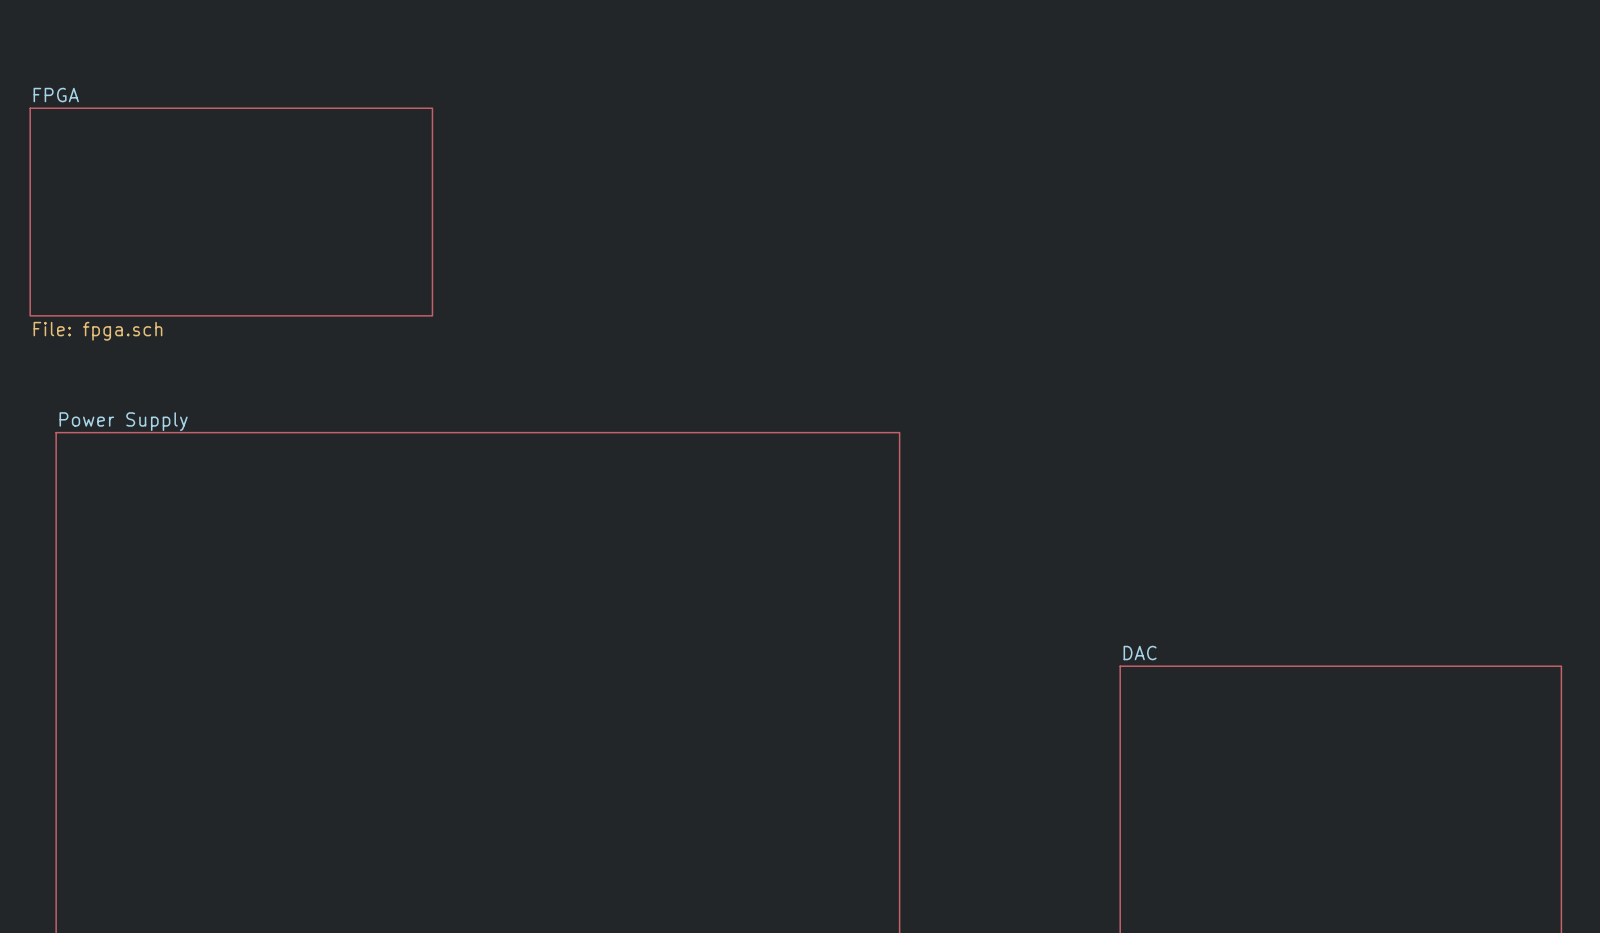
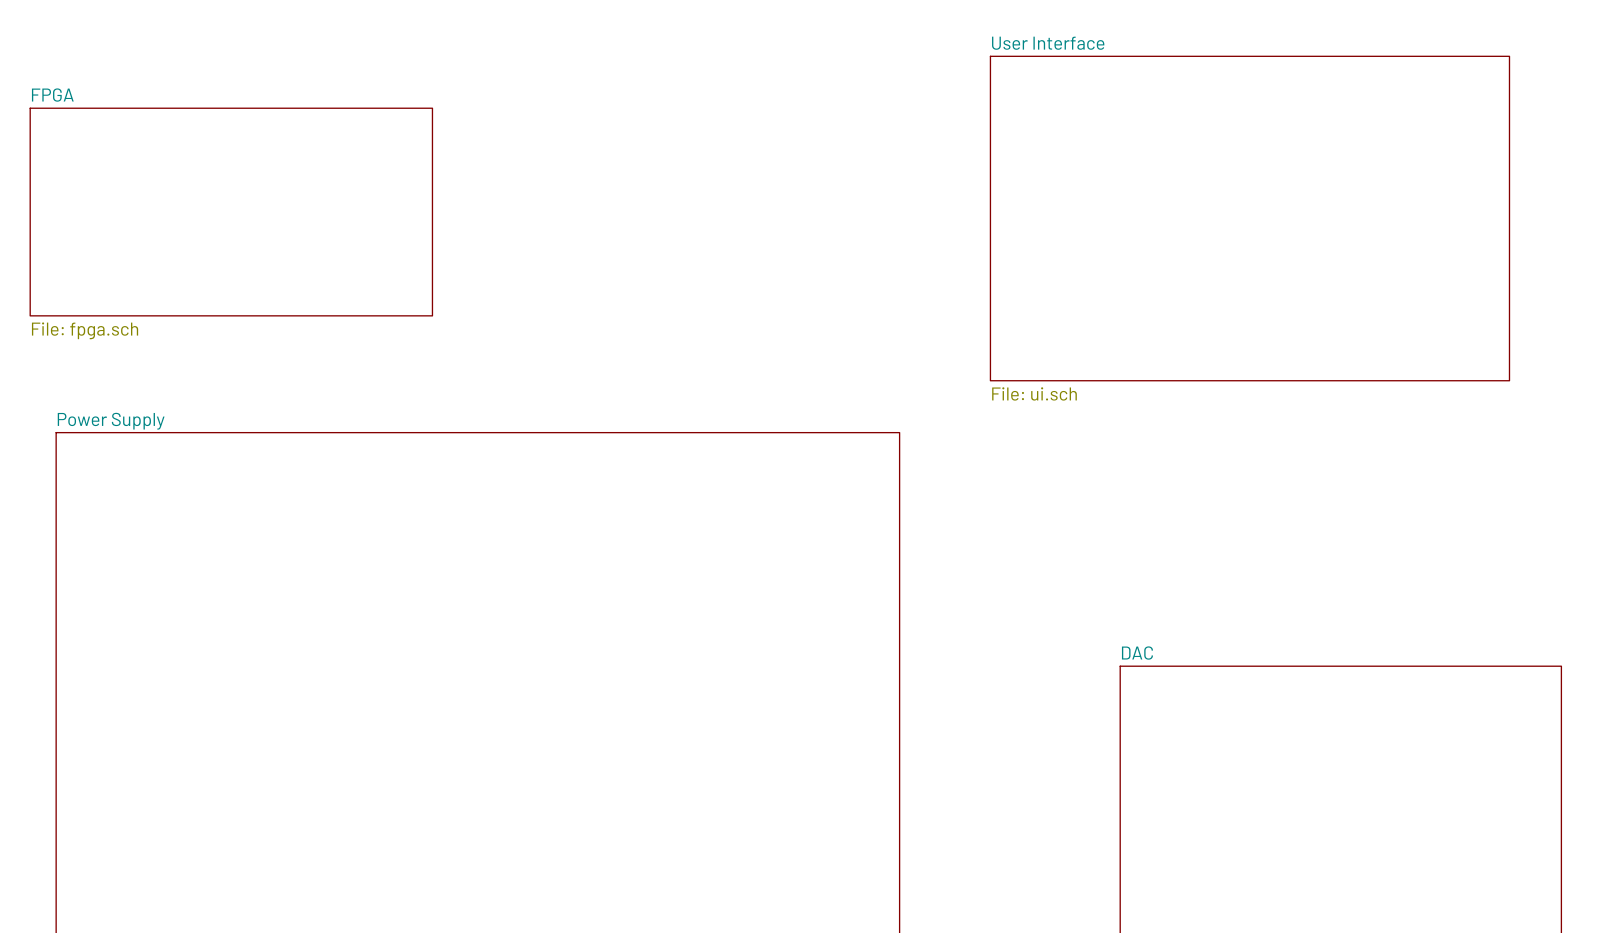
sheet User Interface: none -> File: ui.sch (1249, 218)

